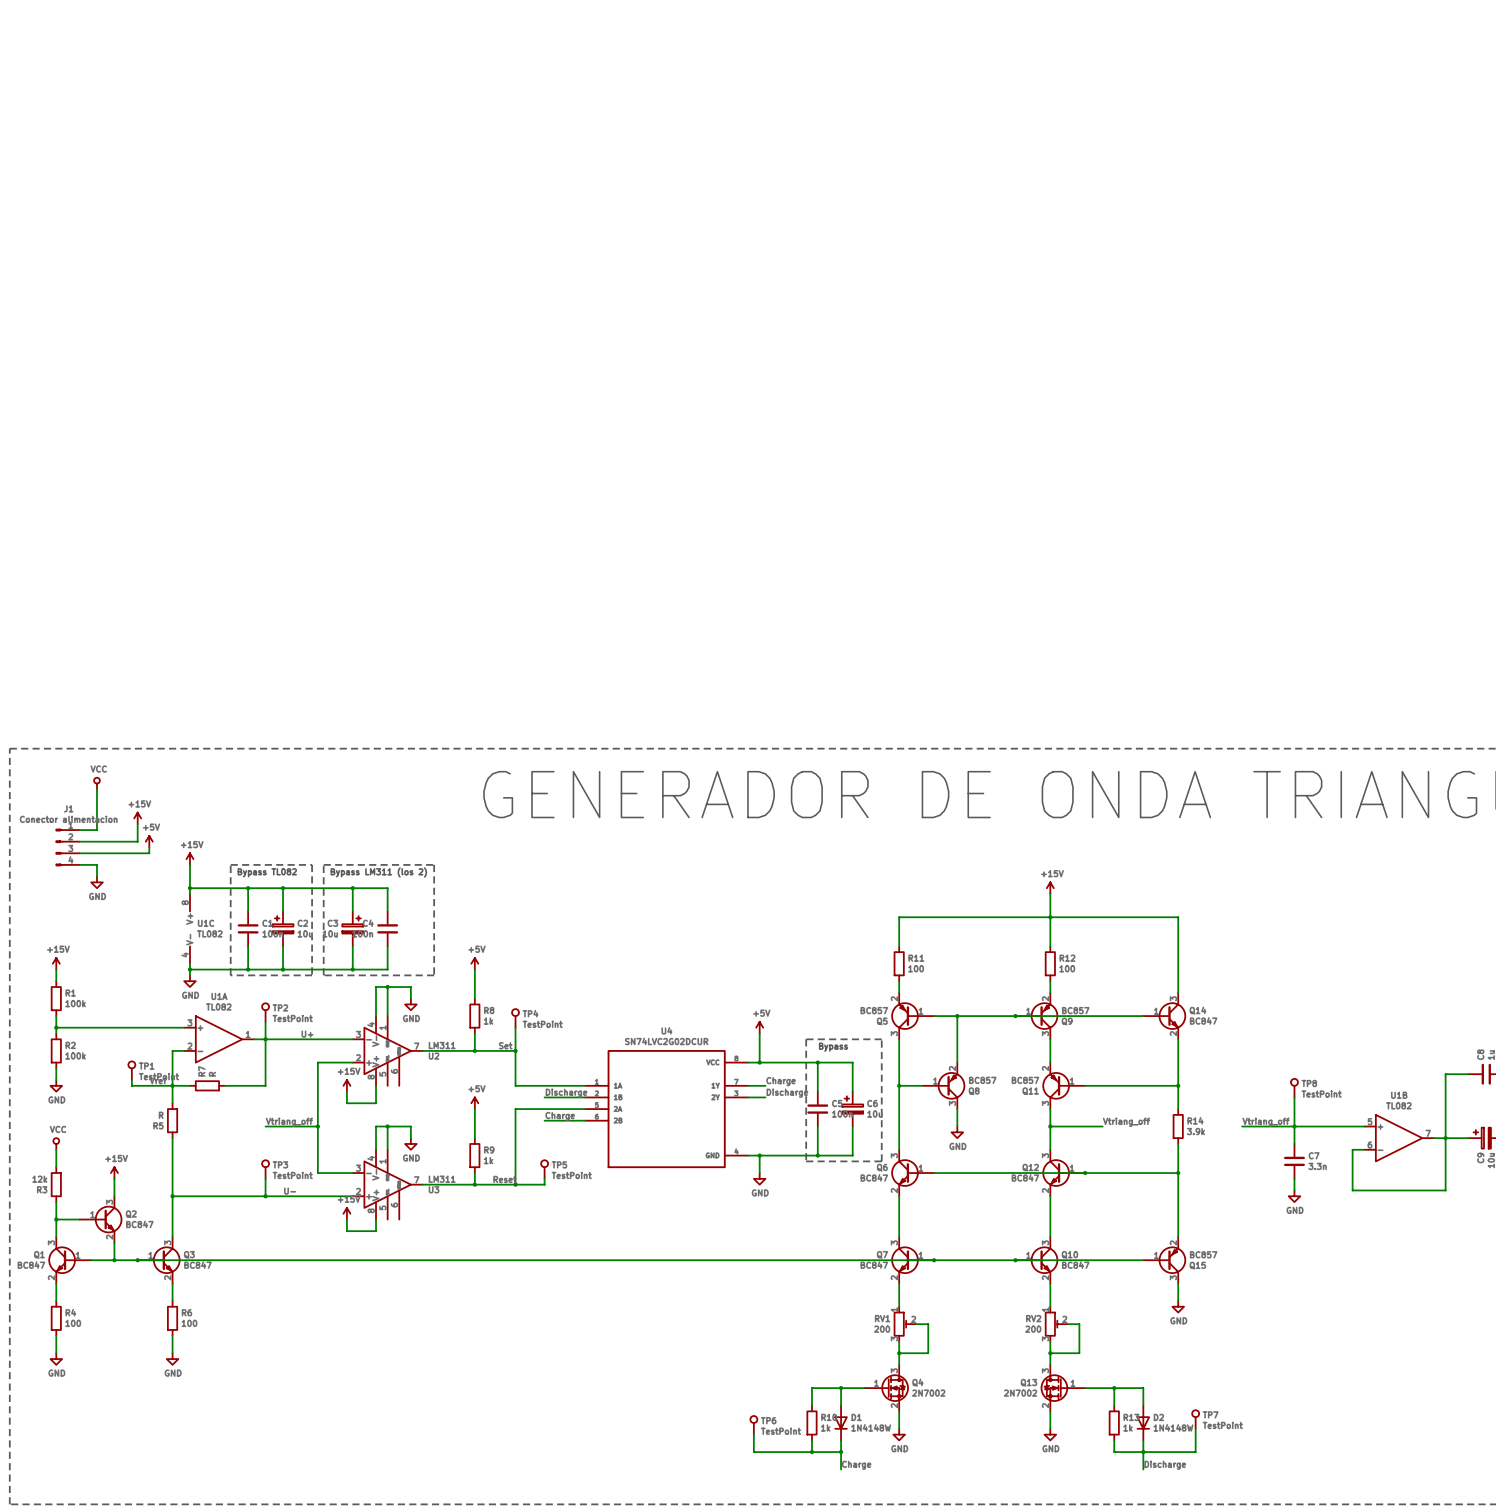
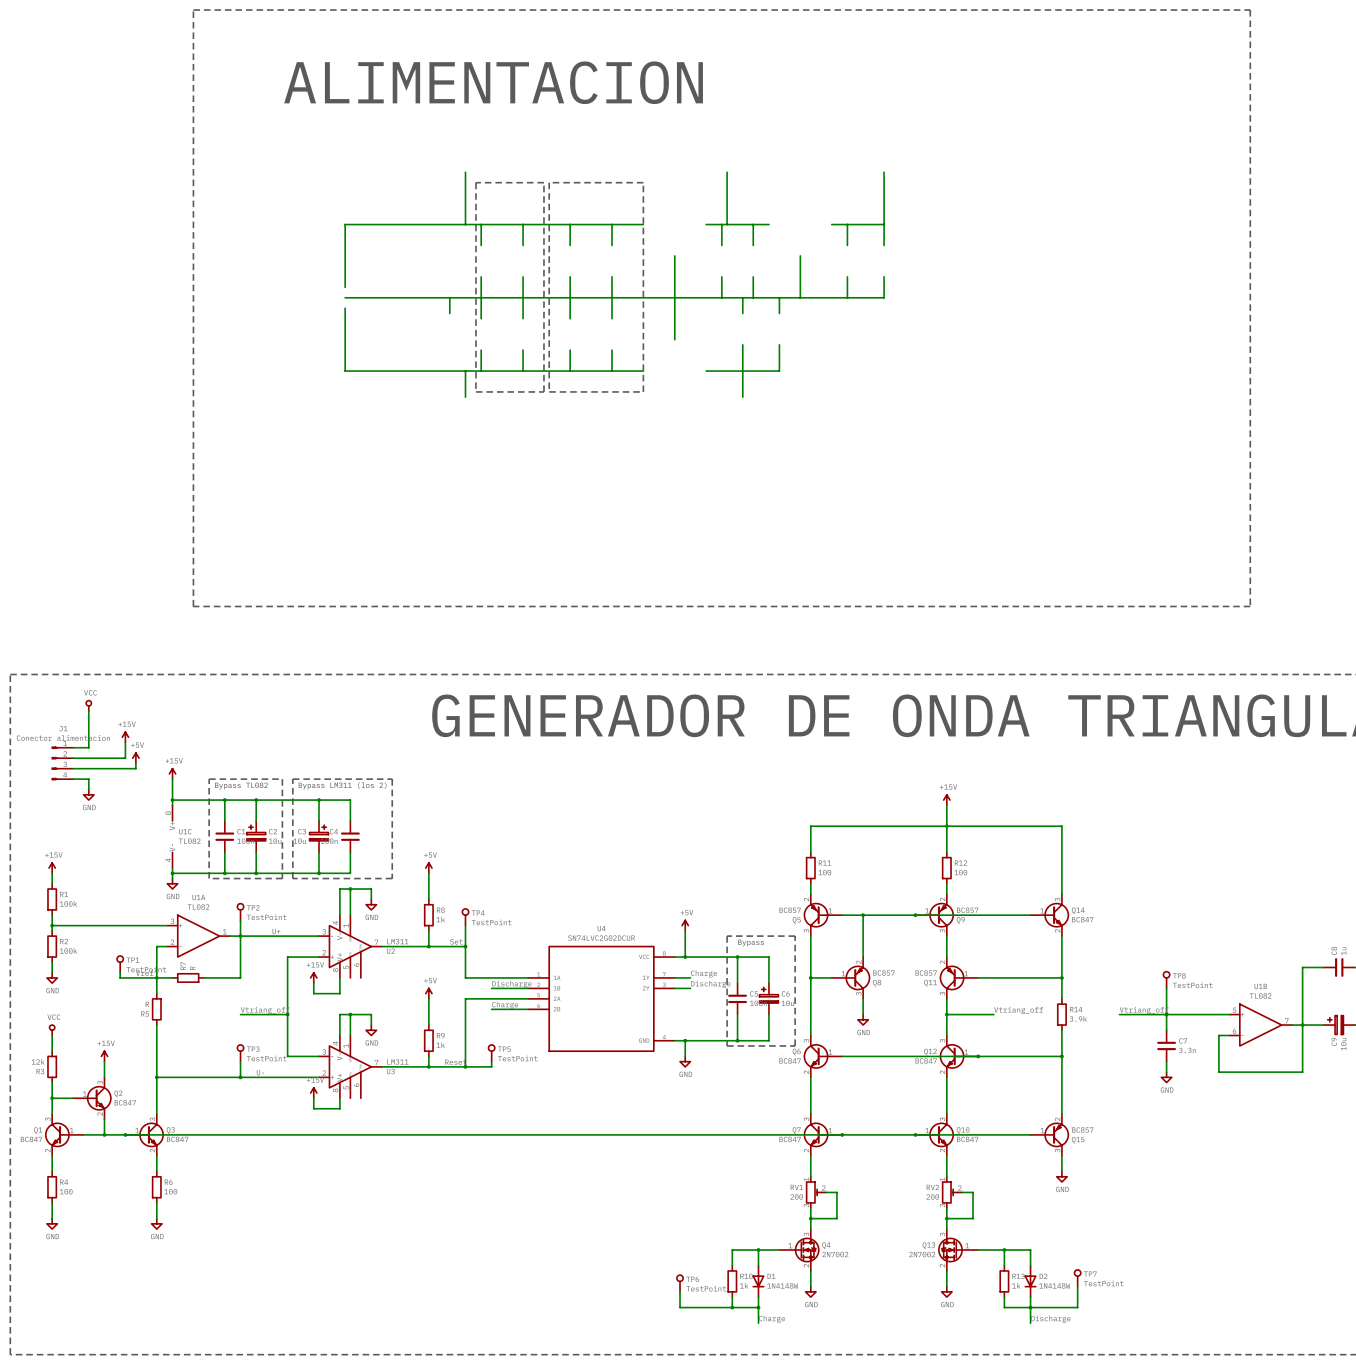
line: none -> (193, 10) (1250, 10) (1250, 606) (193, 606) (193, 10)
text: none -> ALIMENTACION (493, 82)
wire: none -> (465, 172) (465, 224)
wire: none -> (727, 172) (727, 224)
wire: none -> (884, 172) (884, 245)
line: none -> (475, 182) (543, 182) (543, 391) (475, 391) (475, 182)
line: none -> (549, 182) (549, 391) (643, 391) (643, 182) (549, 182)
wire: none -> (481, 224) (481, 245)
wire: none -> (523, 224) (523, 245)
wire: none -> (570, 224) (570, 245)
wire: none -> (611, 224) (611, 245)
wire: none -> (643, 224) (345, 224) (345, 287)
wire: none -> (706, 224) (768, 224)
wire: none -> (721, 224) (721, 245)
wire: none -> (753, 224) (753, 245)
wire: none -> (831, 224) (884, 224)
wire: none -> (847, 224) (847, 245)
wire: none -> (674, 255) (674, 339)
wire: none -> (800, 255) (800, 297)
wire: none -> (481, 276) (481, 318)
wire: none -> (523, 276) (523, 318)
wire: none -> (570, 276) (570, 318)
wire: none -> (611, 276) (611, 318)
wire: none -> (721, 276) (721, 297)
wire: none -> (753, 276) (753, 297)
wire: none -> (847, 276) (847, 297)
wire: none -> (884, 276) (884, 297) (345, 297)
wire: none -> (449, 297) (449, 313)
wire: none -> (742, 297) (742, 313)
wire: none -> (779, 297) (779, 313)
wire: none -> (345, 308) (345, 371) (643, 371)
wire: none -> (742, 344) (742, 397)
wire: none -> (779, 344) (779, 371) (706, 371)
wire: none -> (481, 350) (481, 371)
wire: none -> (523, 350) (523, 371)
wire: none -> (570, 350) (570, 371)
wire: none -> (611, 350) (611, 371)
wire: none -> (465, 371) (465, 397)

